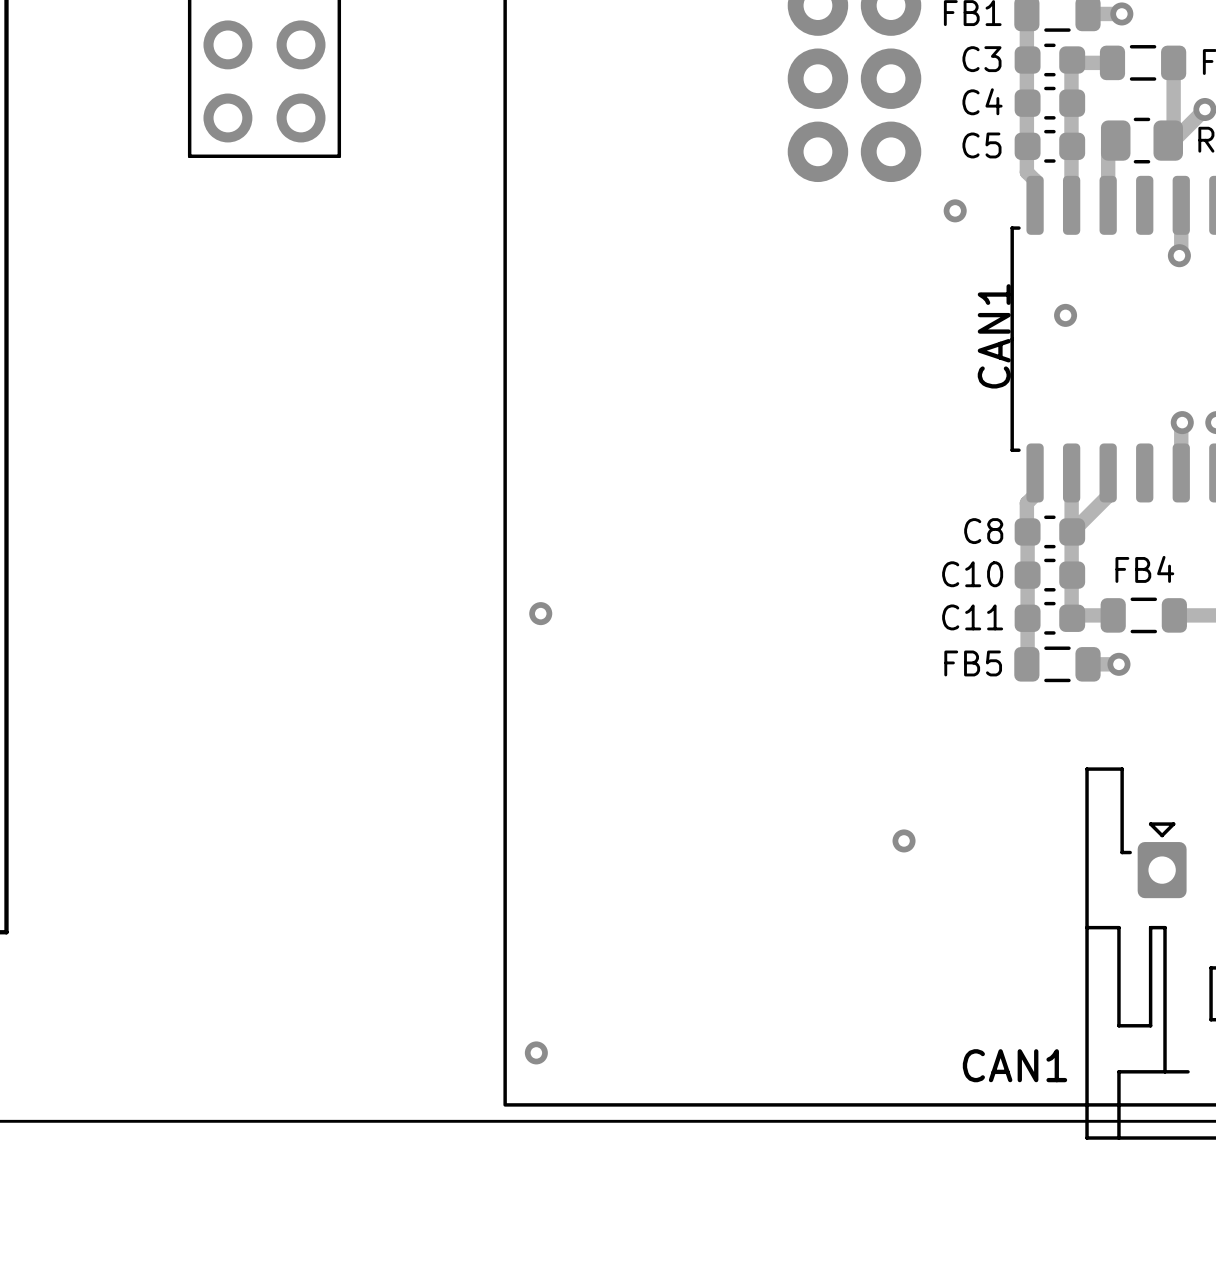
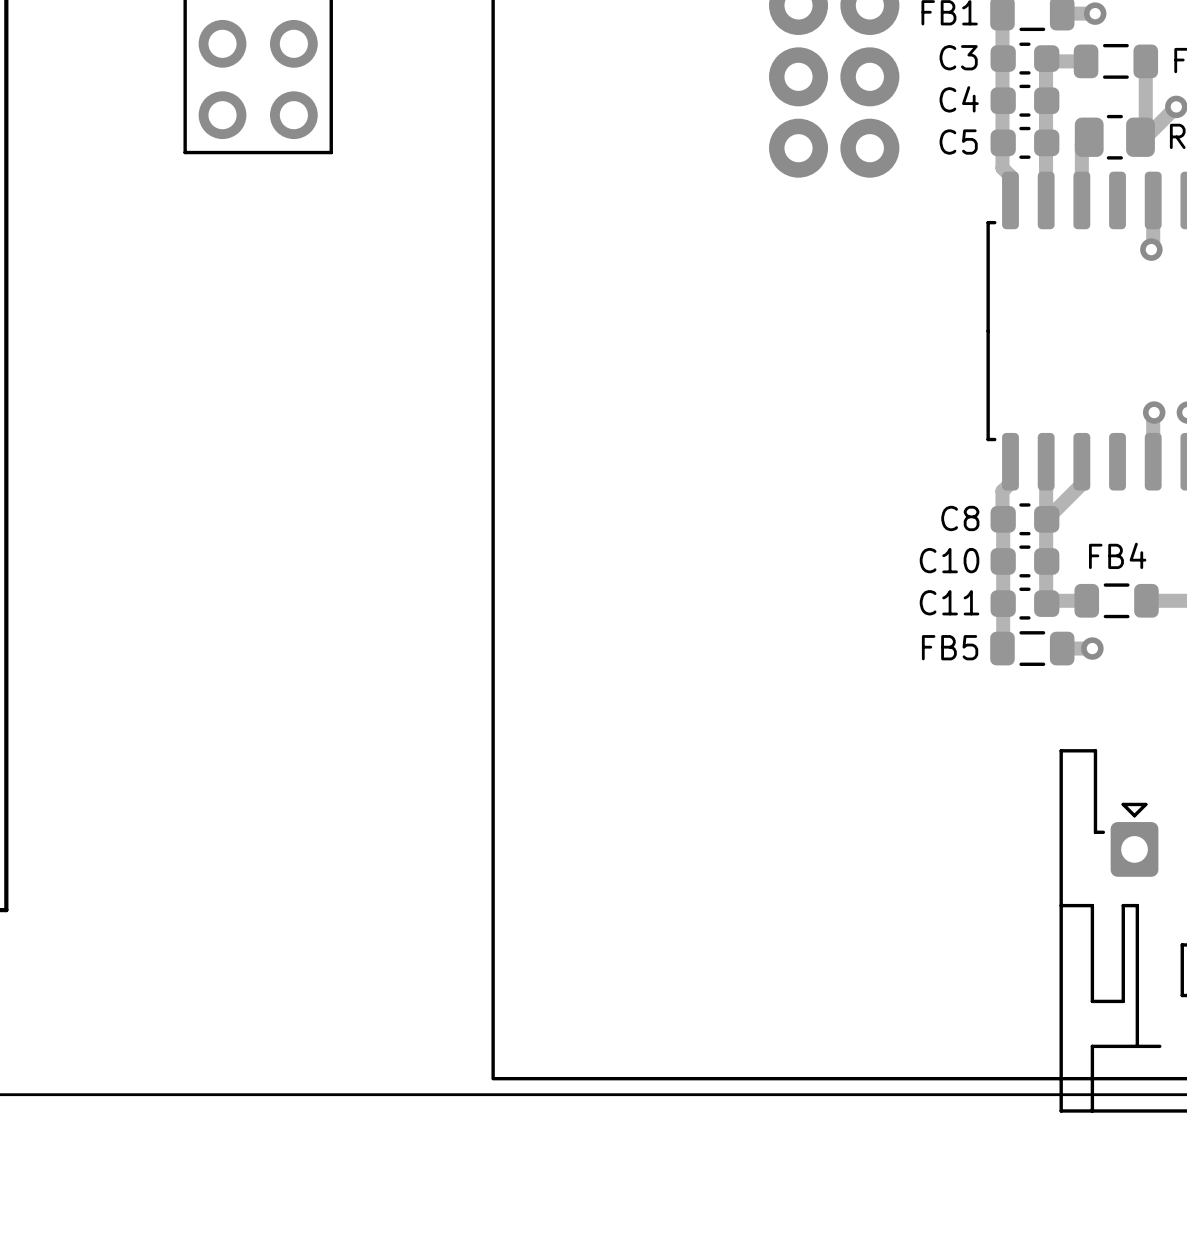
via: (955, 210) -> none
via: (1065, 315) -> none
text: CAN1 (994, 336) -> none
via: (540, 613) -> none
via: (904, 840) -> none
via: (536, 1052) -> none
text: CAN1 (1014, 1065) -> none

